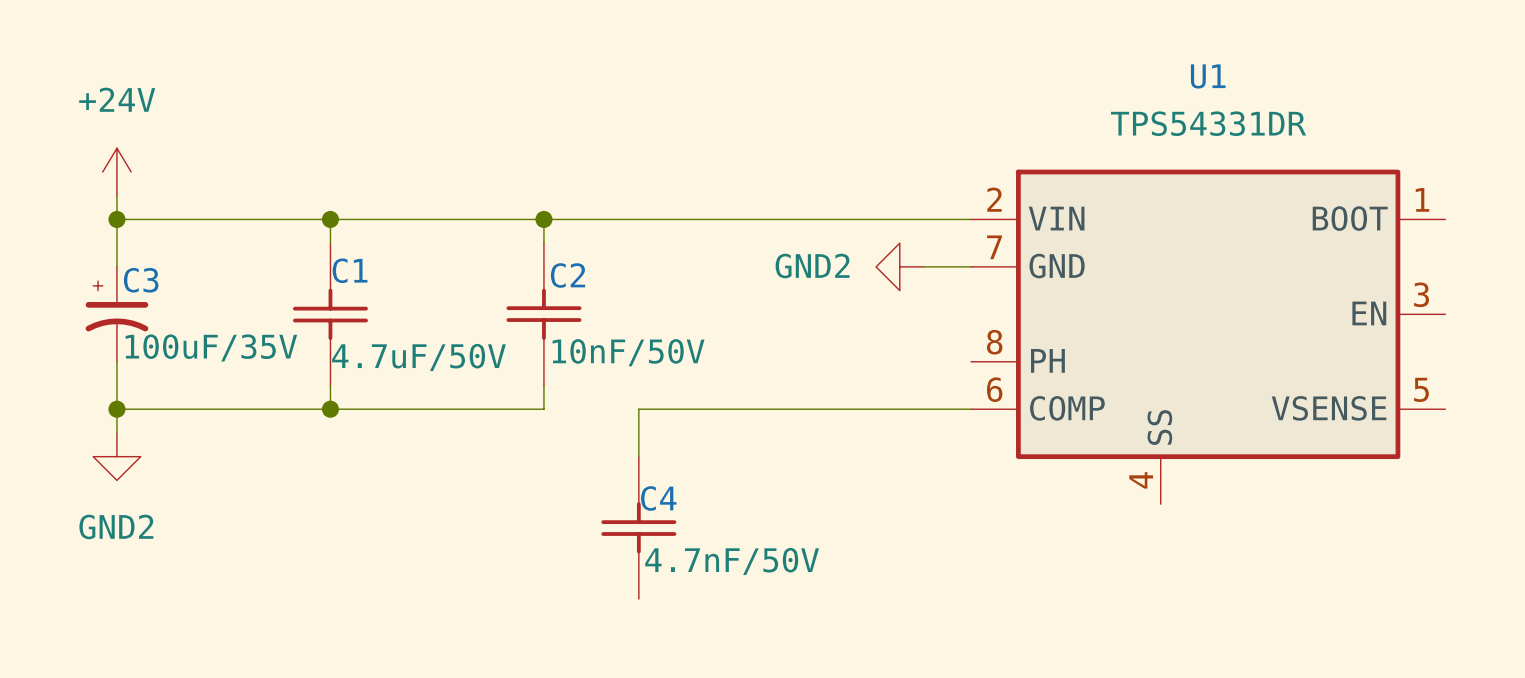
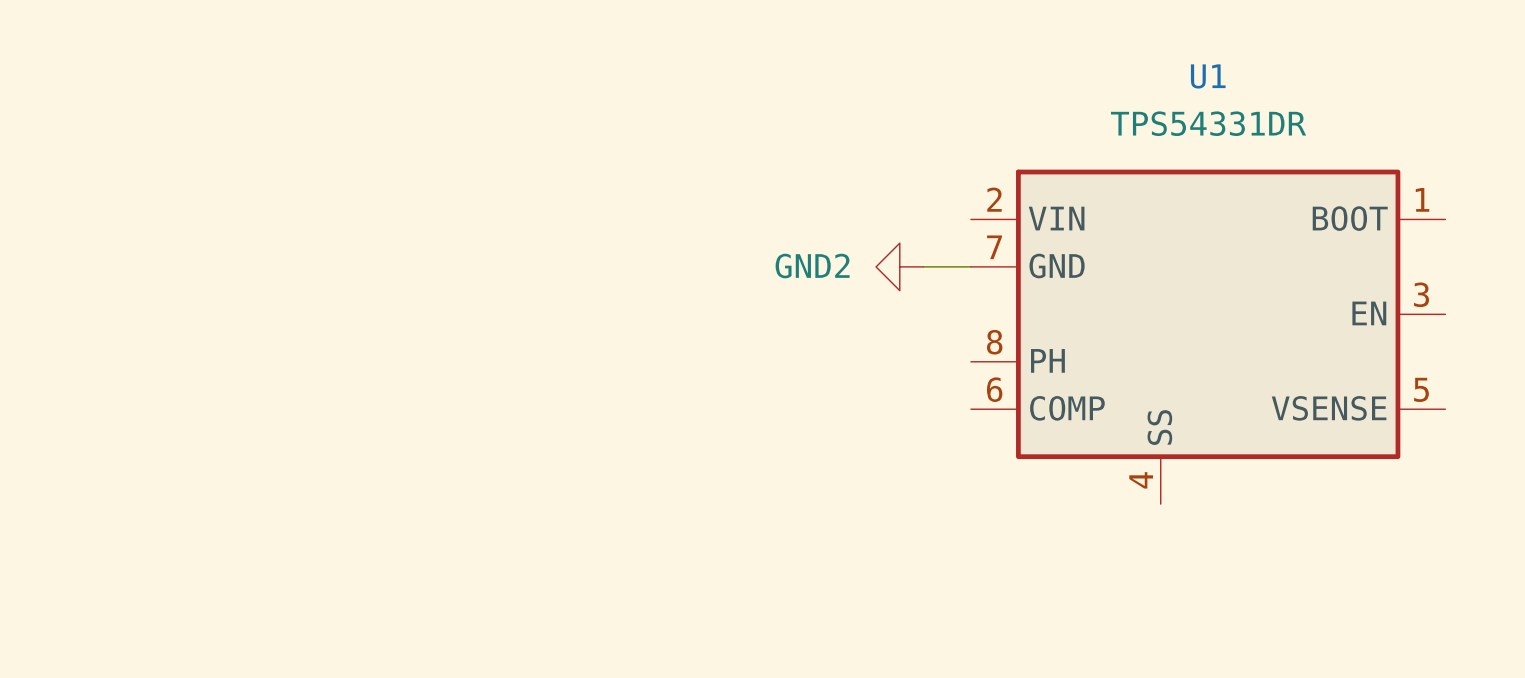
power symbol: +24V (116, 172) -> none
wire: (116, 195) (116, 266) -> none
wire: (116, 219) (970, 219) -> none
junction: (116, 219) -> none
wire: (330, 219) (330, 243) -> none
junction: (330, 219) -> none
wire: (543, 219) (543, 243) -> none
junction: (543, 219) -> none
C3: 100uF/35V (116, 314) -> none
C1: 4.7uF/50V (330, 314) -> none
C2: 10nF/50V (543, 314) -> none
wire: (116, 361) (116, 432) -> none
wire: (330, 385) (330, 409) -> none
wire: (543, 385) (543, 409) (116, 409) -> none
junction: (116, 409) -> none
junction: (330, 409) -> none
wire: (970, 409) (638, 409) (638, 456) -> none
power symbol: GND2 (116, 456) -> none
C4: 4.7nF/50V (638, 527) -> none

